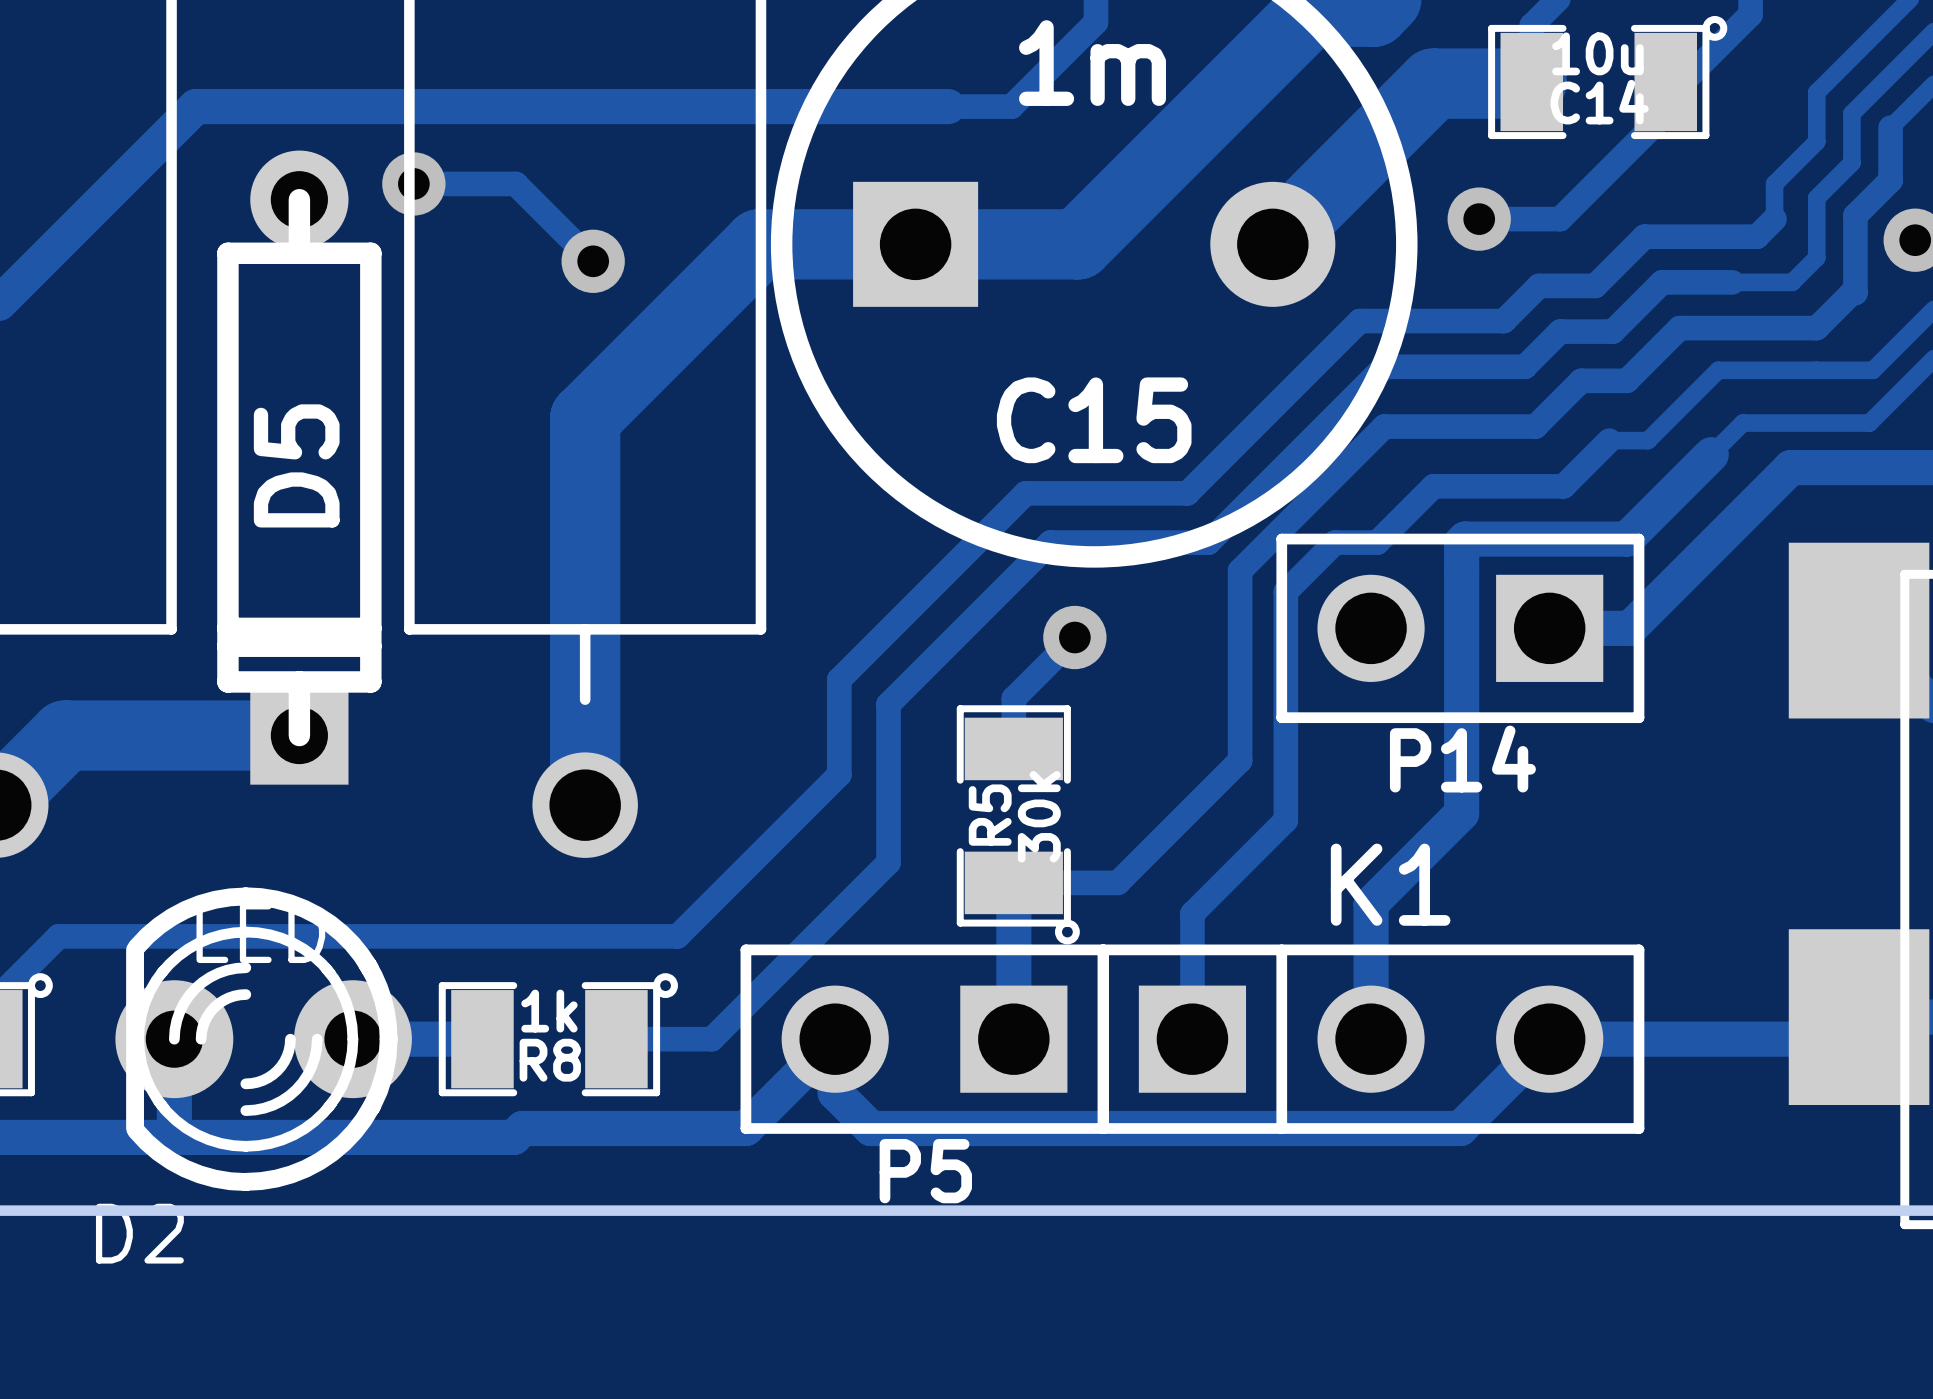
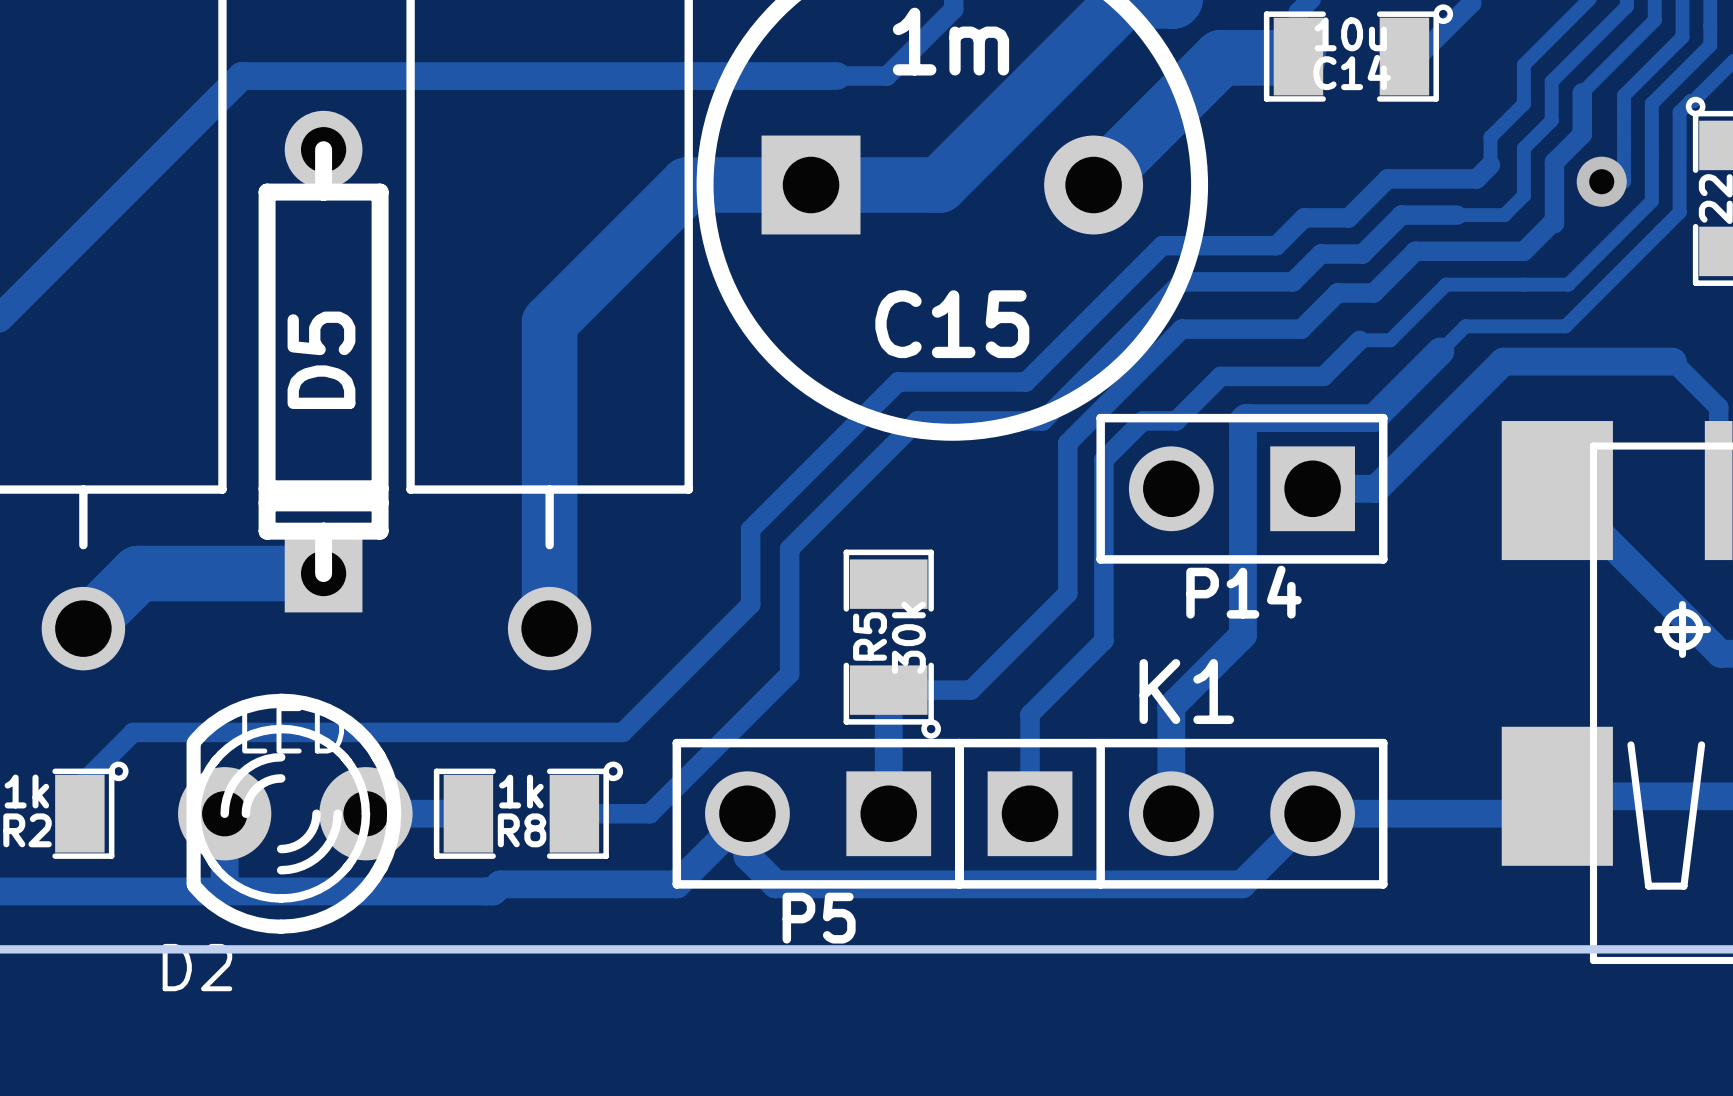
track: (1665, 81) (1665, 113) (1560, 219) (1479, 219) -> none
track: (413, 183) (515, 183) (593, 261) -> none
via: (413, 183) -> none
via: (1479, 219) -> none
via: (593, 261) -> none
track: (1074, 637) (1013, 698) (1013, 748) -> none
via: (1074, 637) -> none

